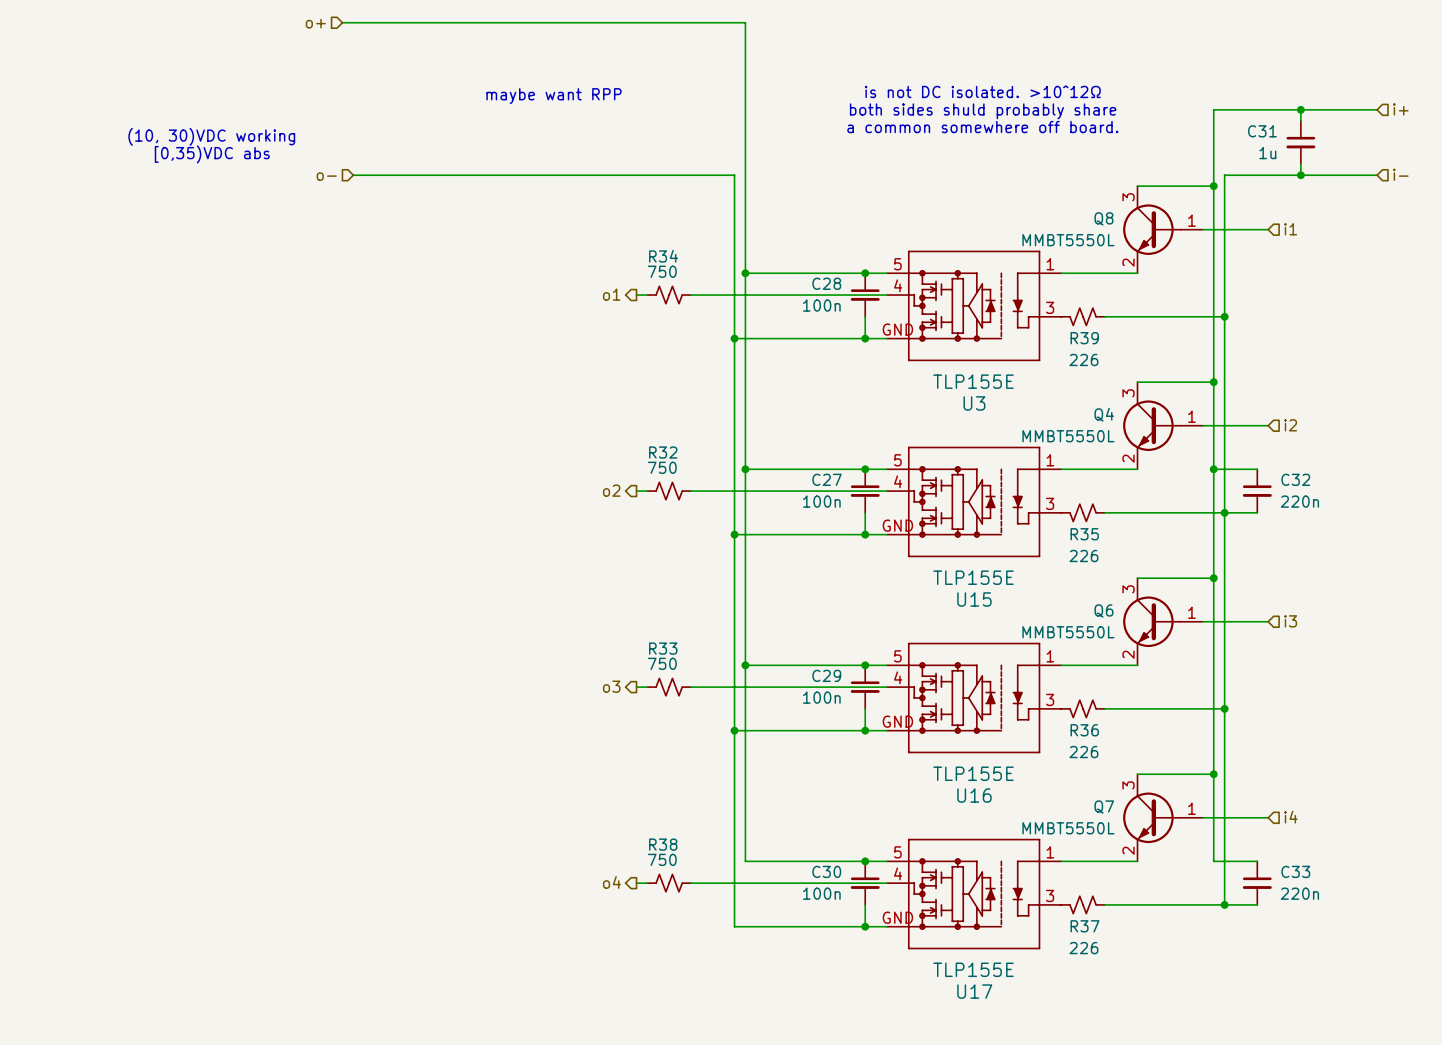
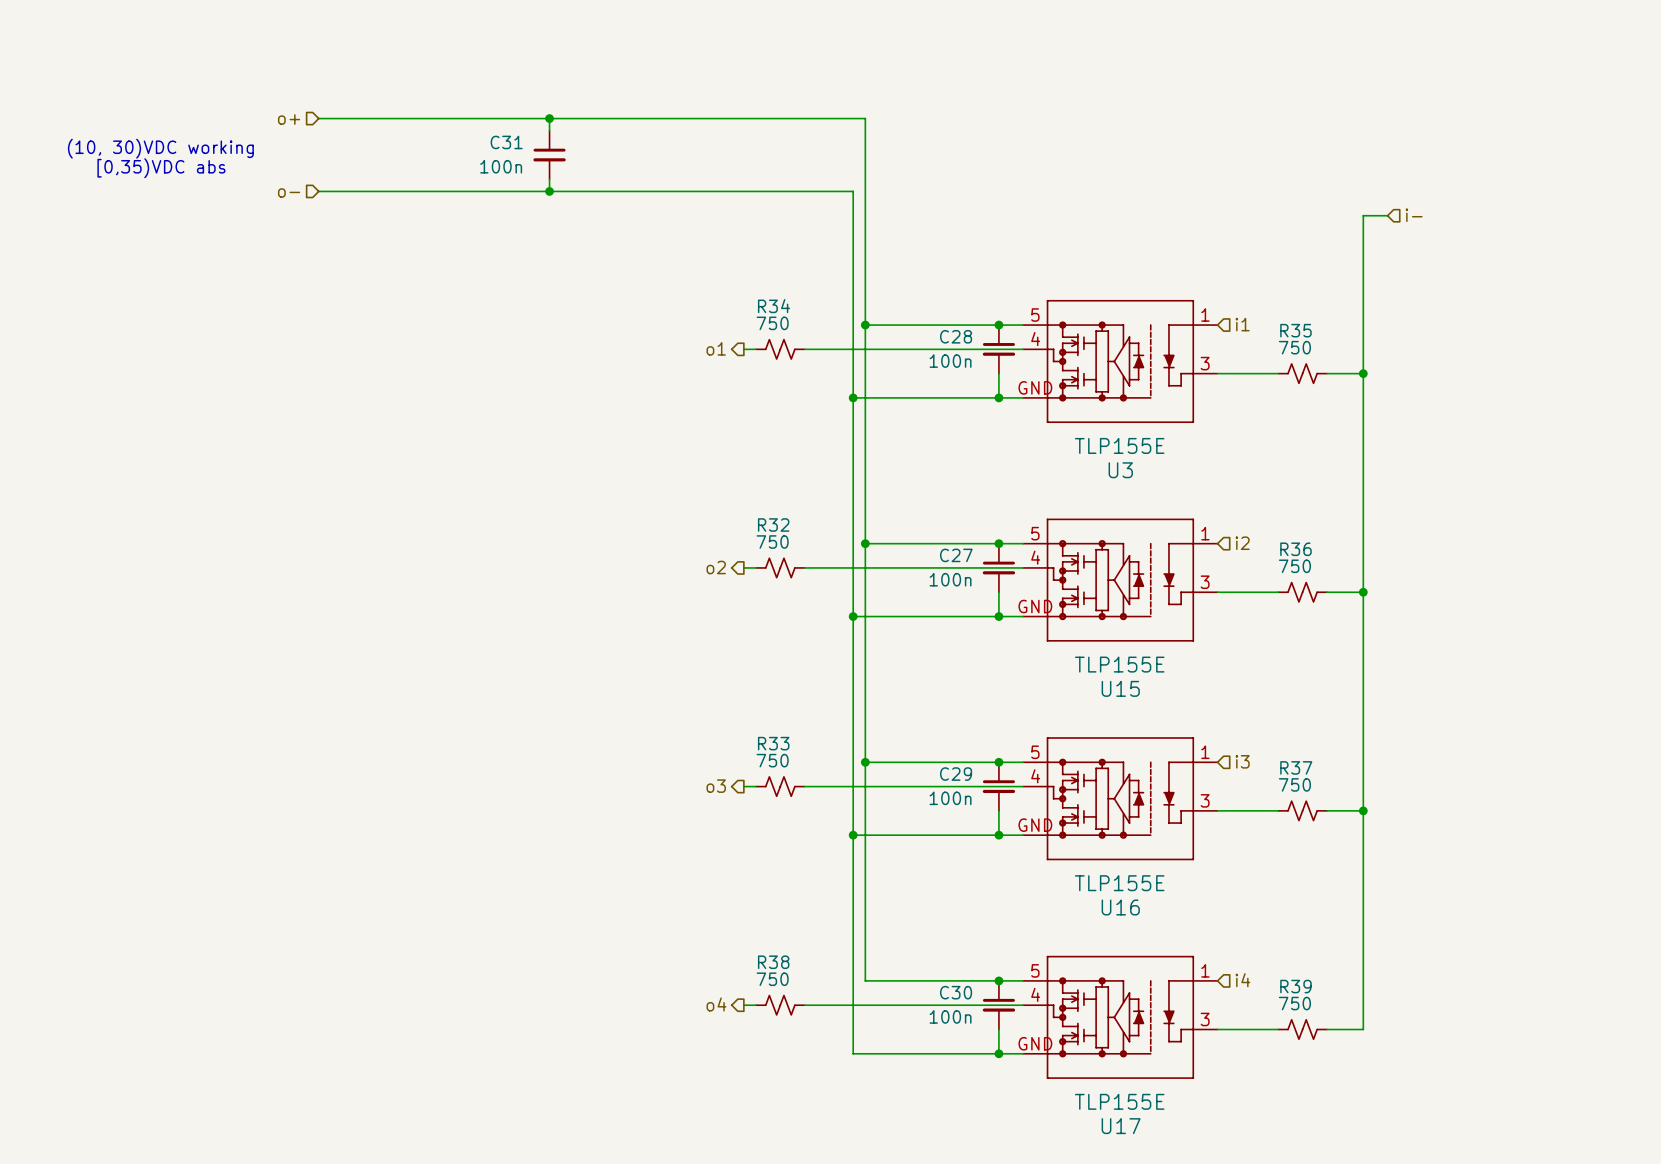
wire: (342, 22) (745, 22) (745, 88) -> (318, 118) (865, 118)
hierarchical label position: o+ (315, 23) -> o+ (289, 119)
wire: none -> (549, 118) (549, 130)
junction: none -> (549, 118)
text: is not DC isolated. >10^12Ω (982, 91) -> none
text: maybe want RPP (553, 96) -> none
wire: (1300, 109) (1300, 120) -> none
junction: (1300, 109) -> none
wire: (1377, 109) (1213, 109) (1213, 861) (1257, 861) -> none
hierarchical label: i+ (1400, 109) -> none
text: both sides shuld probably share (983, 111) -> none
text: a common somewhere off board. (982, 127) -> none
text position: (10, 30)VDC working (211, 136) -> (10, 30)VDC working (160, 148)
wire: none -> (549, 179) (549, 191)
C31 position: (1300, 142) -> (549, 155)
junction: none -> (549, 191)
C31 value: 1u (1267, 153) -> 100n (501, 166)
text position: [0,35)VDC abs (212, 154) -> [0,35)VDC abs (161, 168)
wire: (1300, 164) (1300, 175) -> none
hierarchical label position: i- (1400, 174) -> i- (1414, 215)
wire: (353, 175) (734, 175) -> (318, 191) (853, 191) (853, 215)
junction: (1300, 175) -> none
wire: (1377, 175) (1224, 175) (1224, 904) -> none
hierarchical label position: o- (326, 176) -> o- (289, 193)
wire: (1137, 186) (1213, 186) -> none
junction: (1213, 186) -> none
Q8: MMBT5550L (1162, 229) -> none
wire: (1202, 229) (1268, 229) -> none
hierarchical label position: i1 (1290, 229) -> i1 (1242, 324)
wire: (1061, 273) (1137, 273) -> none
R39 flip: as is (1083, 316) -> left-right (1302, 1029)
R39 position: (1083, 316) -> (1302, 1029)
wire: (1191, 316) (1224, 316) -> none
junction position: (1224, 316) -> (1363, 373)
R39 name position: R39 (1084, 338) -> R39 (1295, 986)
R39 value: 226 (1083, 359) -> 750 (1294, 1003)
wire: (1137, 382) (1213, 382) -> none
junction: (1213, 382) -> none
Q4: MMBT5550L (1162, 425) -> none
wire: (1202, 425) (1268, 425) -> none
hierarchical label position: i2 (1290, 425) -> i2 (1242, 543)
wire: (1061, 469) (1137, 469) -> none
wire: (1213, 469) (1257, 469) -> none
junction: (1213, 469) -> none
C32: 220n (1257, 491) -> none
R35 flip: as is (1083, 512) -> left-right (1302, 373)
R35 position: (1083, 512) -> (1302, 373)
wire: (1191, 512) (1257, 512) -> none
junction: none -> (1363, 592)
junction: (1224, 512) -> none
R35 name position: R35 (1084, 534) -> R35 (1295, 330)
R35 value: 226 (1083, 556) -> 750 (1294, 347)
wire: (1137, 578) (1213, 578) -> none
junction: (1213, 578) -> none
Q6: MMBT5550L (1162, 621) -> none
wire: (1202, 621) (1268, 621) -> none
hierarchical label position: i3 (1290, 621) -> i3 (1242, 761)
wire: (1061, 665) (1137, 665) -> none
R36 flip: as is (1083, 708) -> left-right (1302, 592)
R36 position: (1083, 708) -> (1302, 592)
wire: (1191, 708) (1224, 708) -> none
junction position: (1224, 708) -> (1363, 810)
R36 name position: R36 (1084, 730) -> R36 (1295, 549)
R36 value: 226 (1083, 752) -> 750 (1294, 566)
wire: (1137, 774) (1213, 774) -> none
junction: (1213, 774) -> none
Q7: MMBT5550L (1162, 817) -> none
wire: (1202, 817) (1268, 817) -> none
hierarchical label position: i4 (1290, 817) -> i4 (1242, 980)
wire: (1061, 861) (1137, 861) -> none
C33: 220n (1257, 883) -> none
R37 flip: as is (1083, 904) -> left-right (1302, 810)
R37 position: (1083, 904) -> (1302, 810)
wire: (1191, 904) (1257, 904) -> (1363, 1029) (1363, 215) (1387, 215)
junction: (1224, 904) -> none
R37 name position: R37 (1085, 926) -> R37 (1296, 767)
R37 value: 226 (1083, 948) -> 750 (1294, 784)

